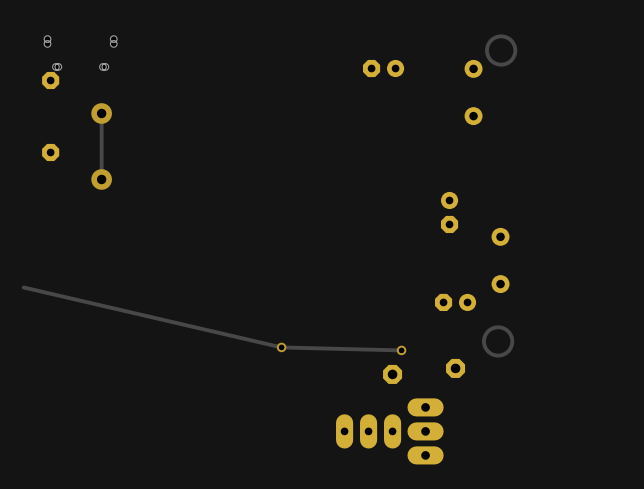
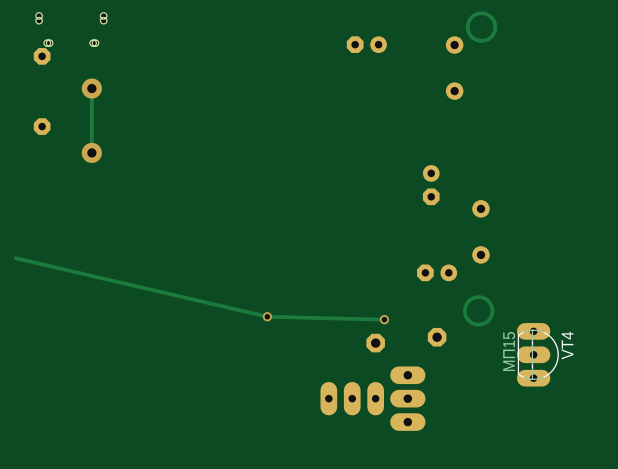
VT4: none -> МП15 (537, 354)

